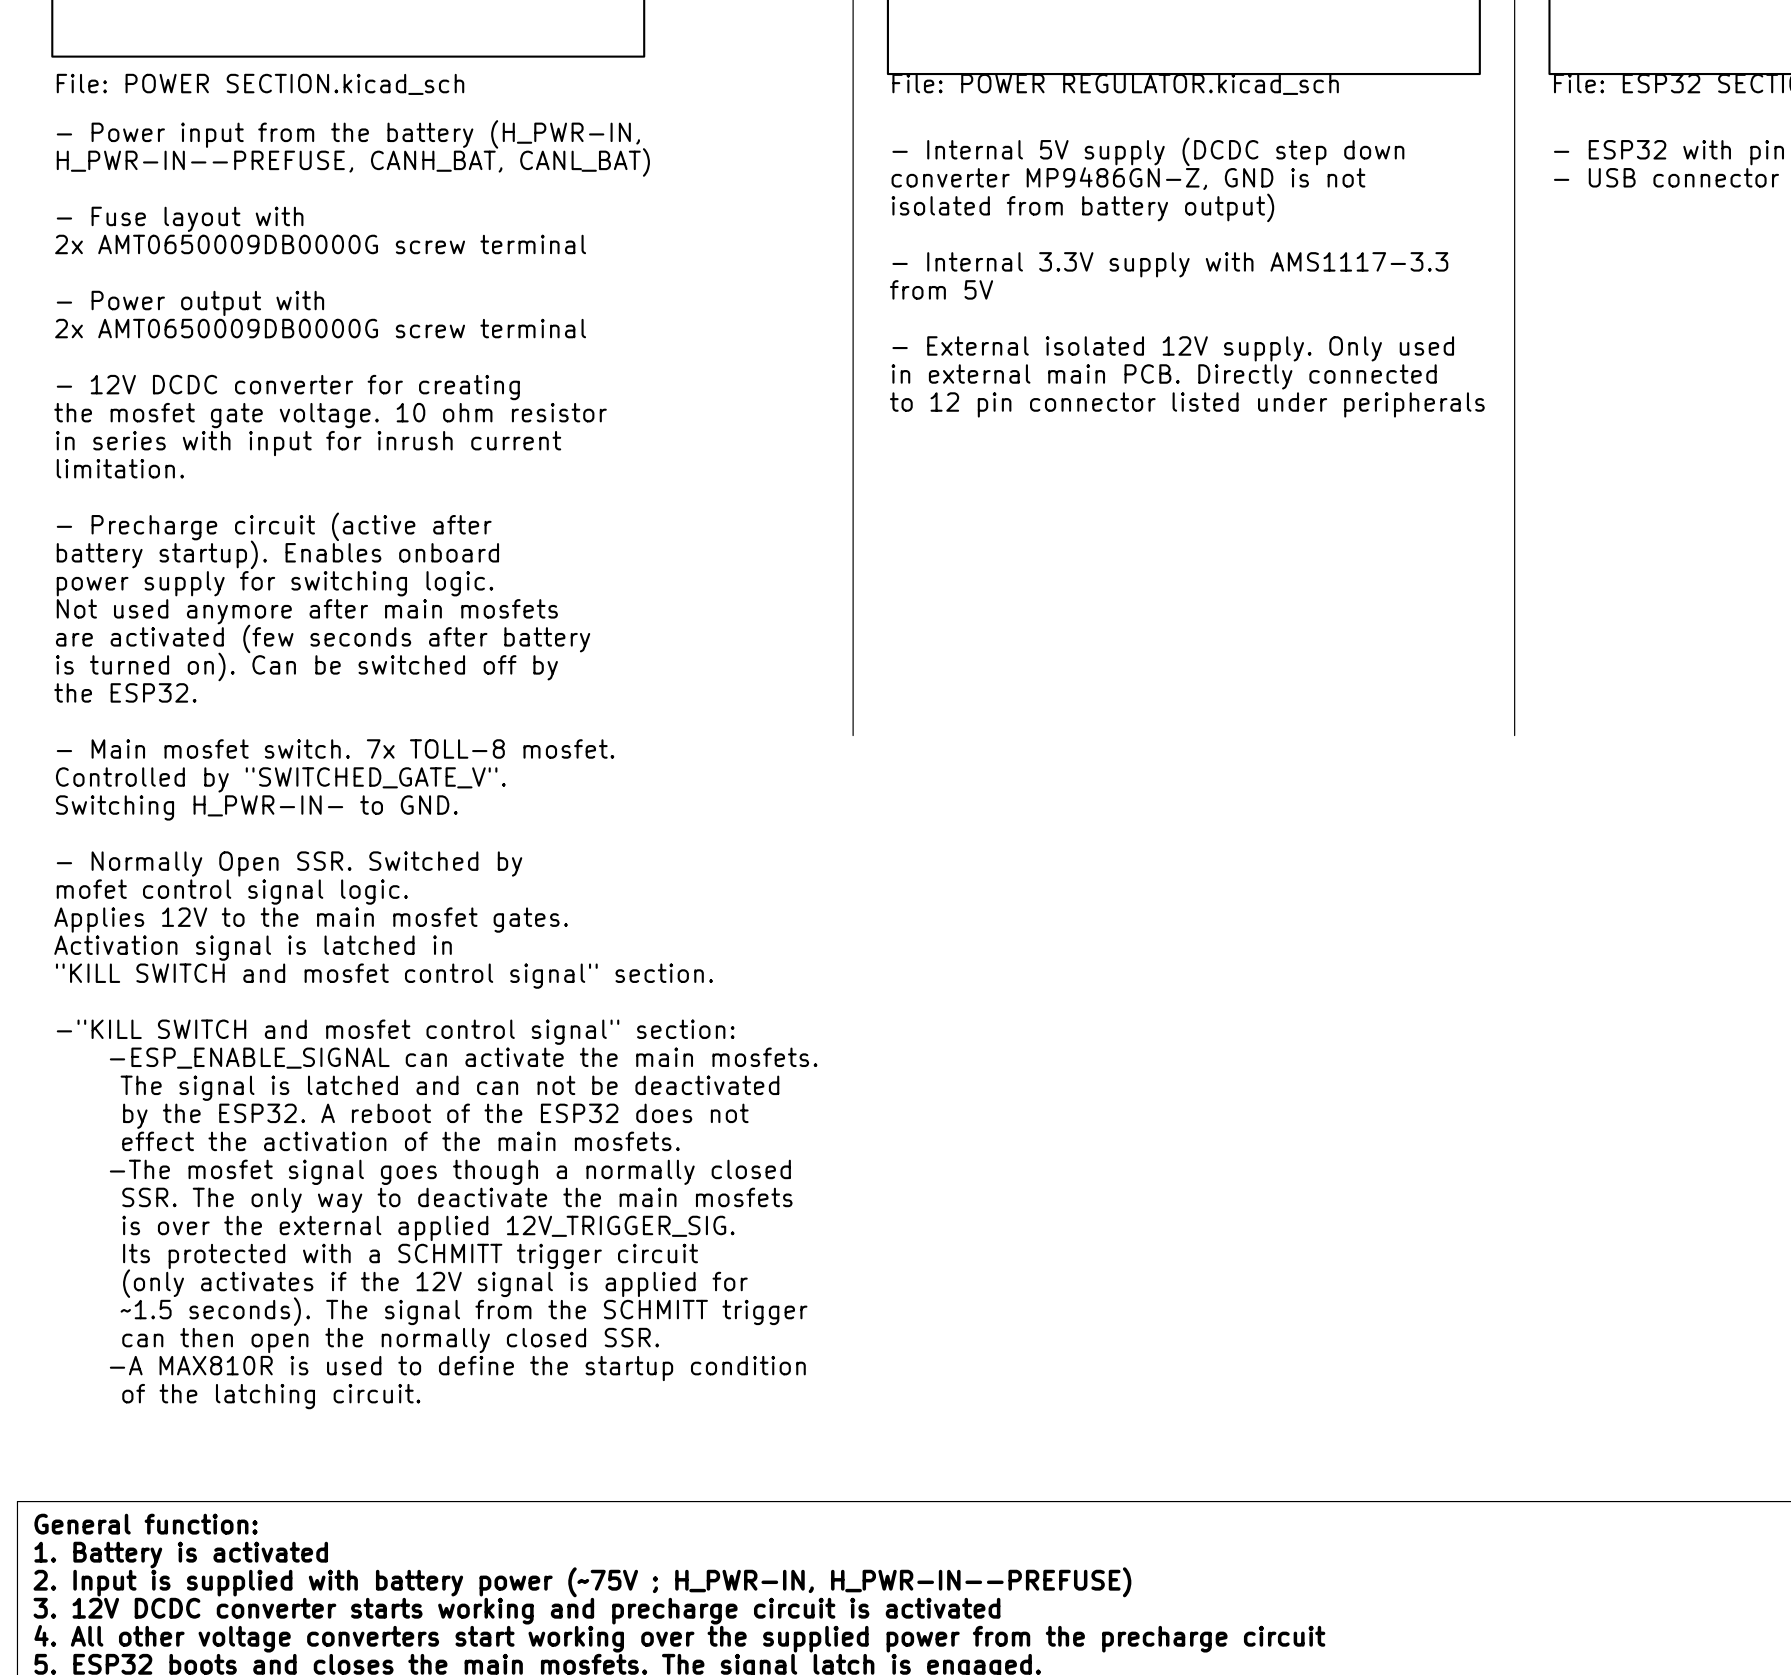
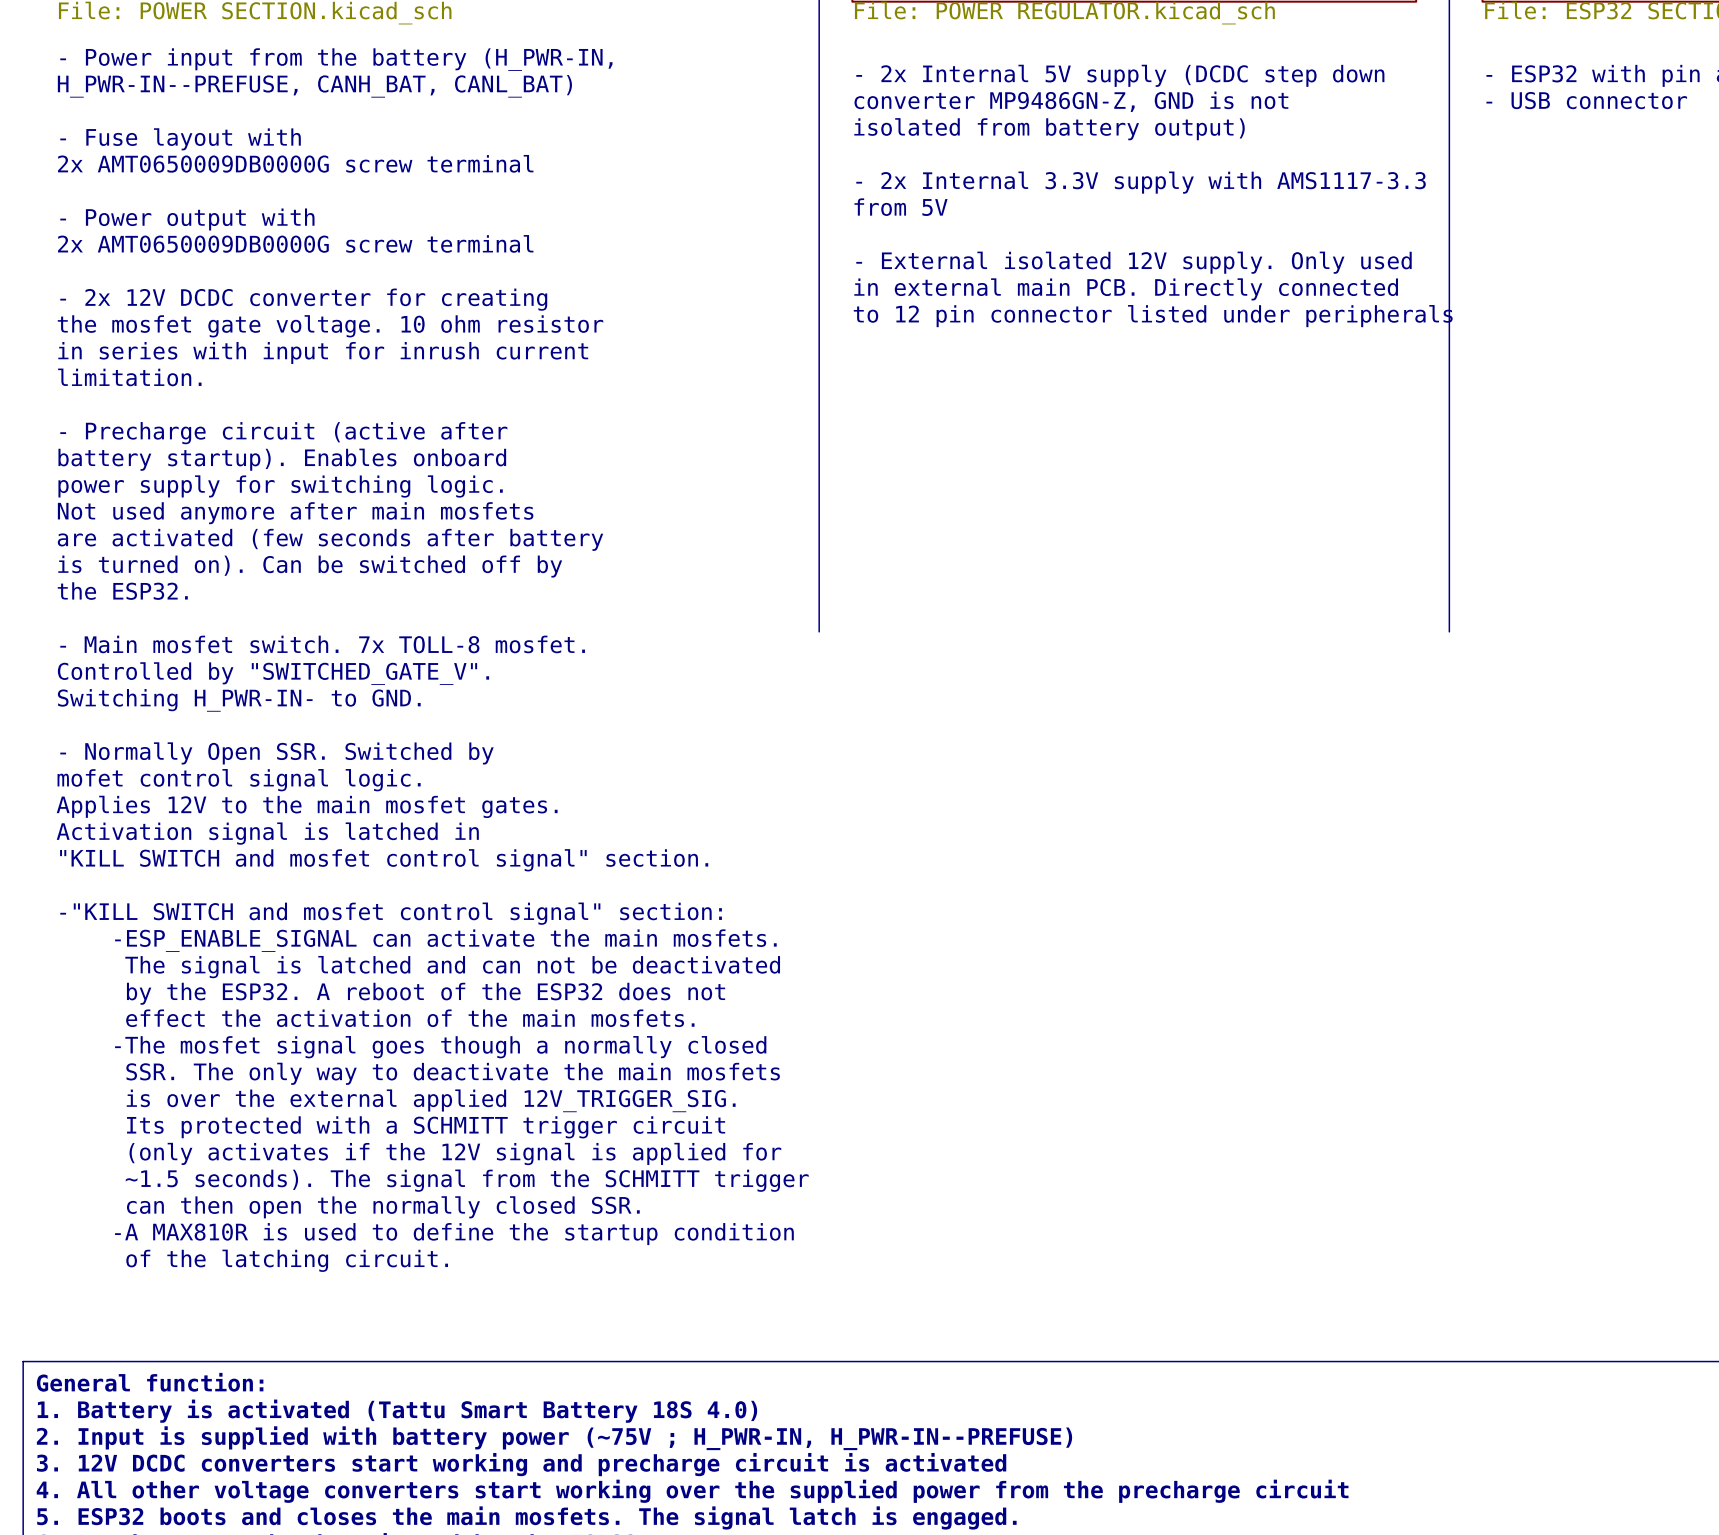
text: - Internal 5V supply (DCDC step down (1148, 151) -> - 2x Internal 5V supply (DCDC step down (1120, 75)
text: - Internal 3.3V supply with AMS1117-3.3 (1170, 264) -> - 2x Internal 3.3V supply with AMS1117-3.3 (1141, 182)
text: - 12V DCDC converter for creating (288, 387) -> - 2x 12V DCDC converter for creating (303, 299)
text: 1. Battery is activated (181, 1555) -> 1. Battery is activated (Tattu Smart Battery 18S 4.0) (397, 1411)
text: 3. 12V DCDC converter starts working and precharge circuit is activated (516, 1611) -> 3. 12V DCDC converters start working and precharge circuit is activated (521, 1464)

